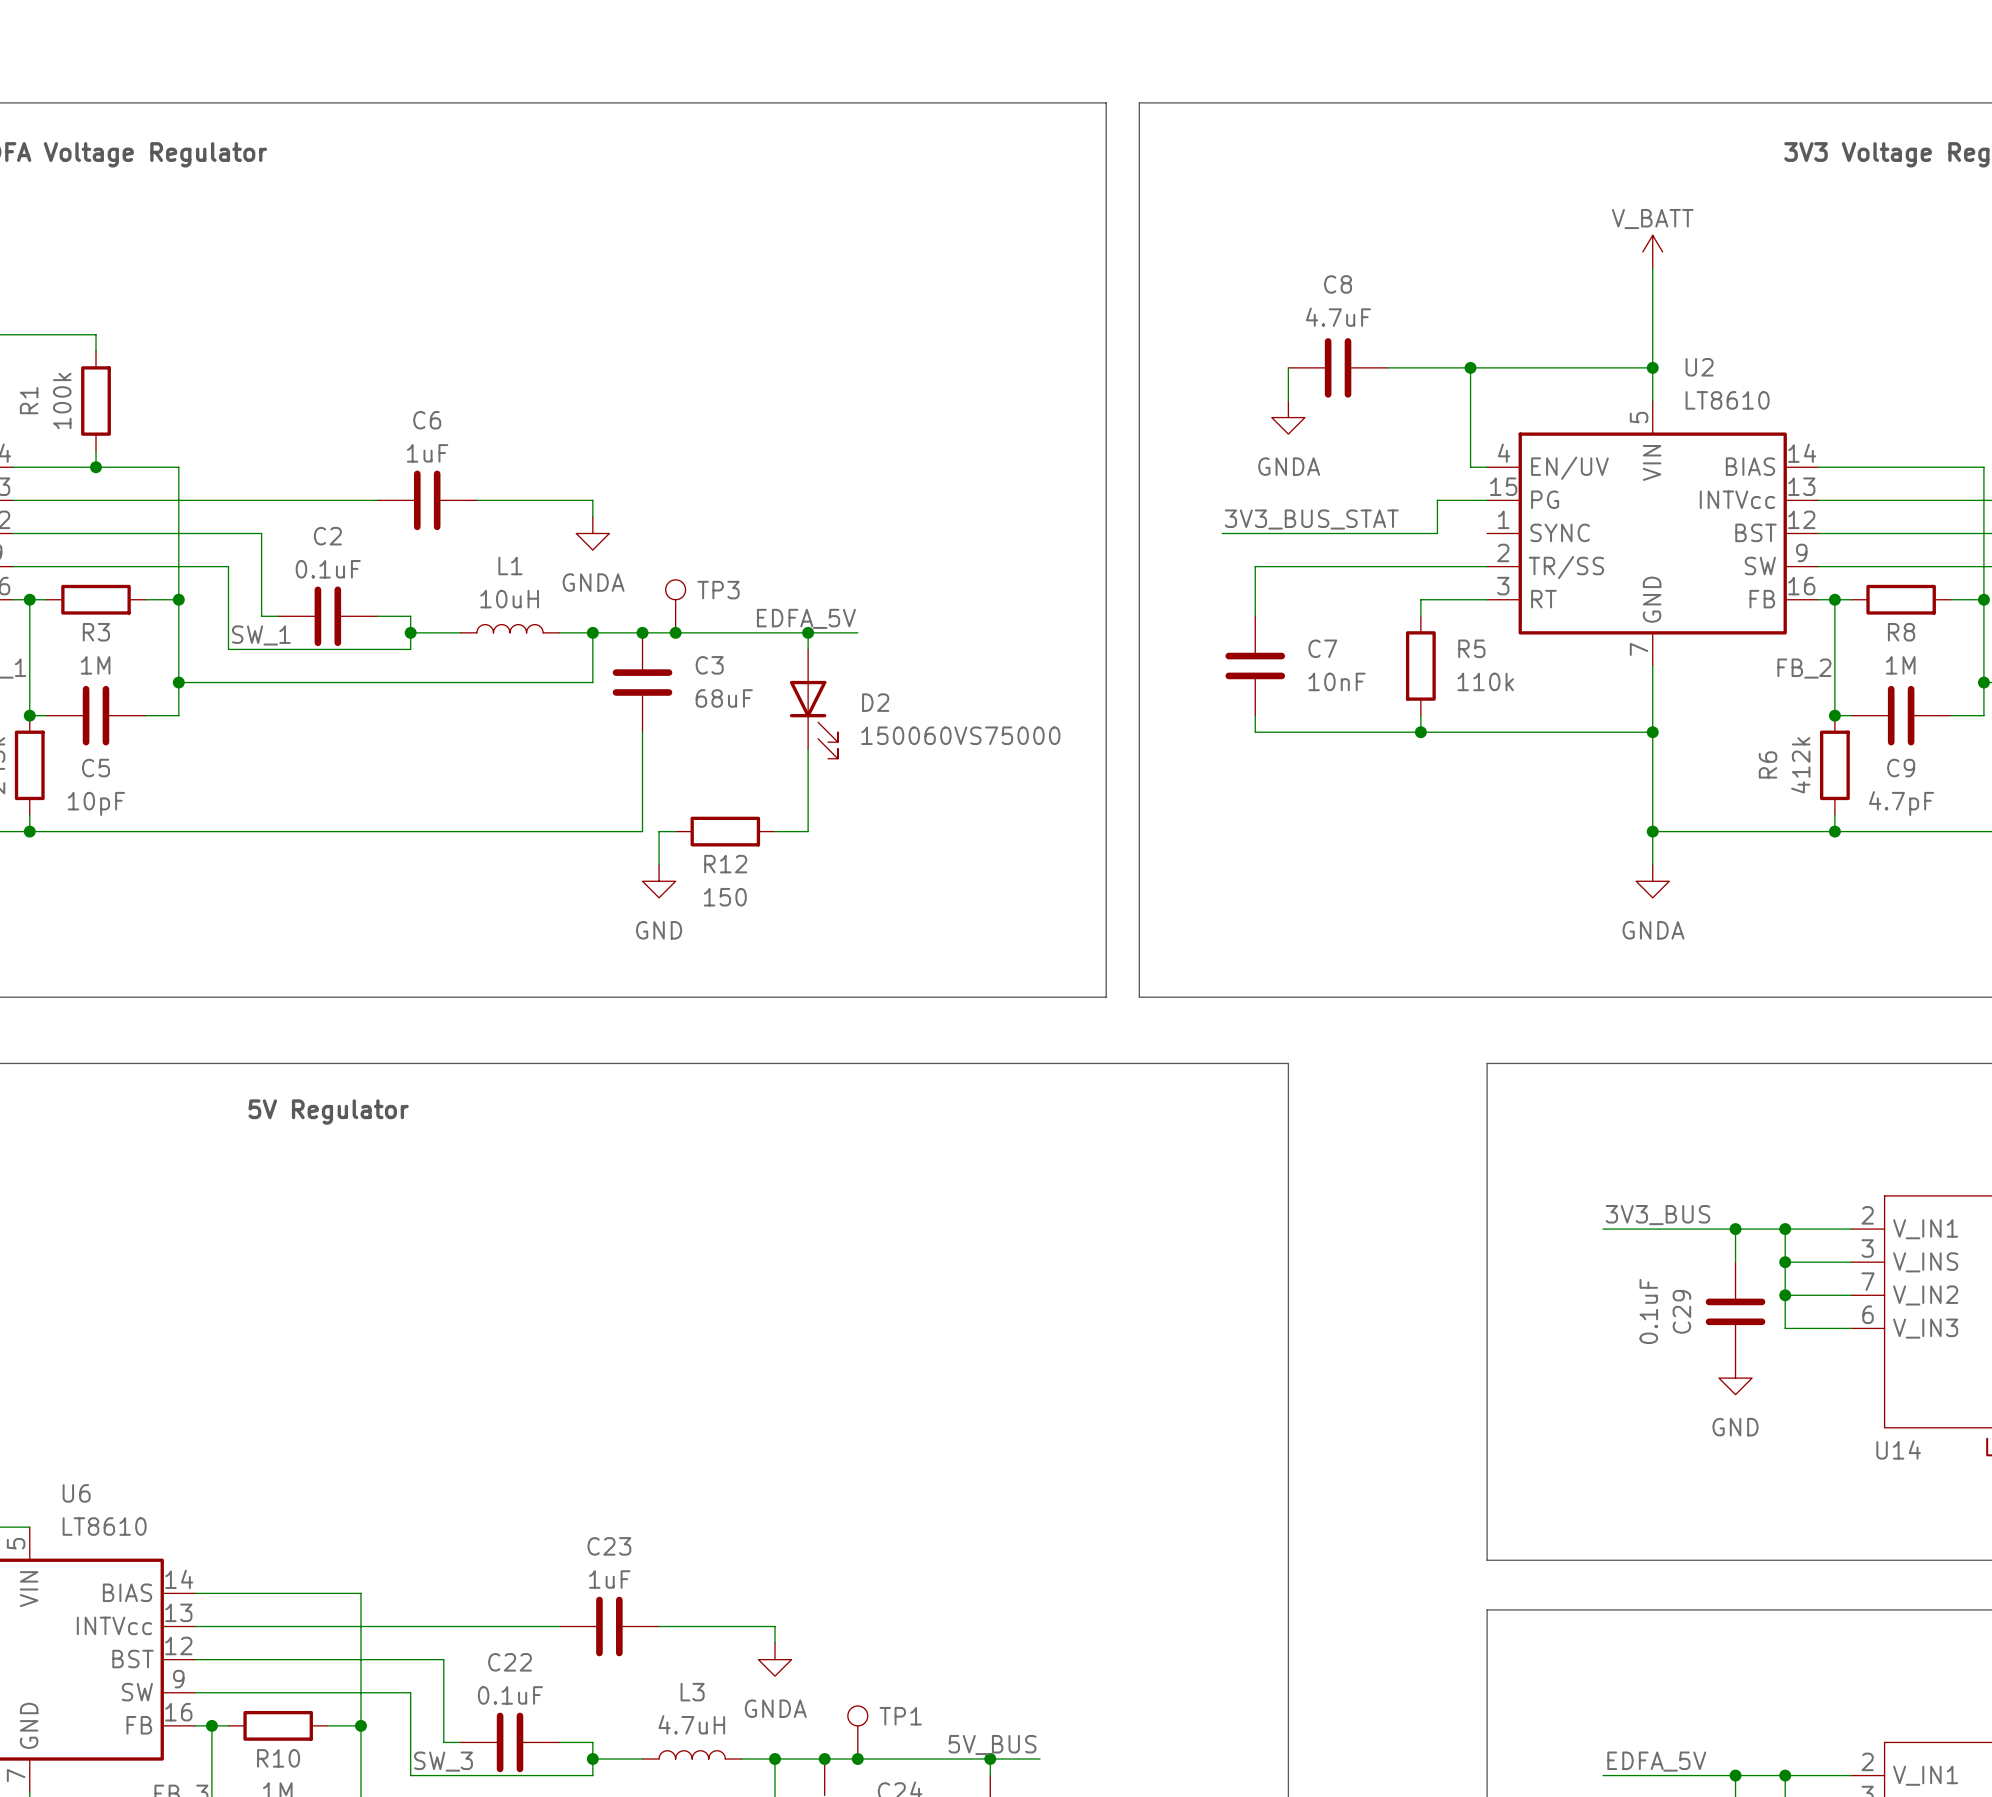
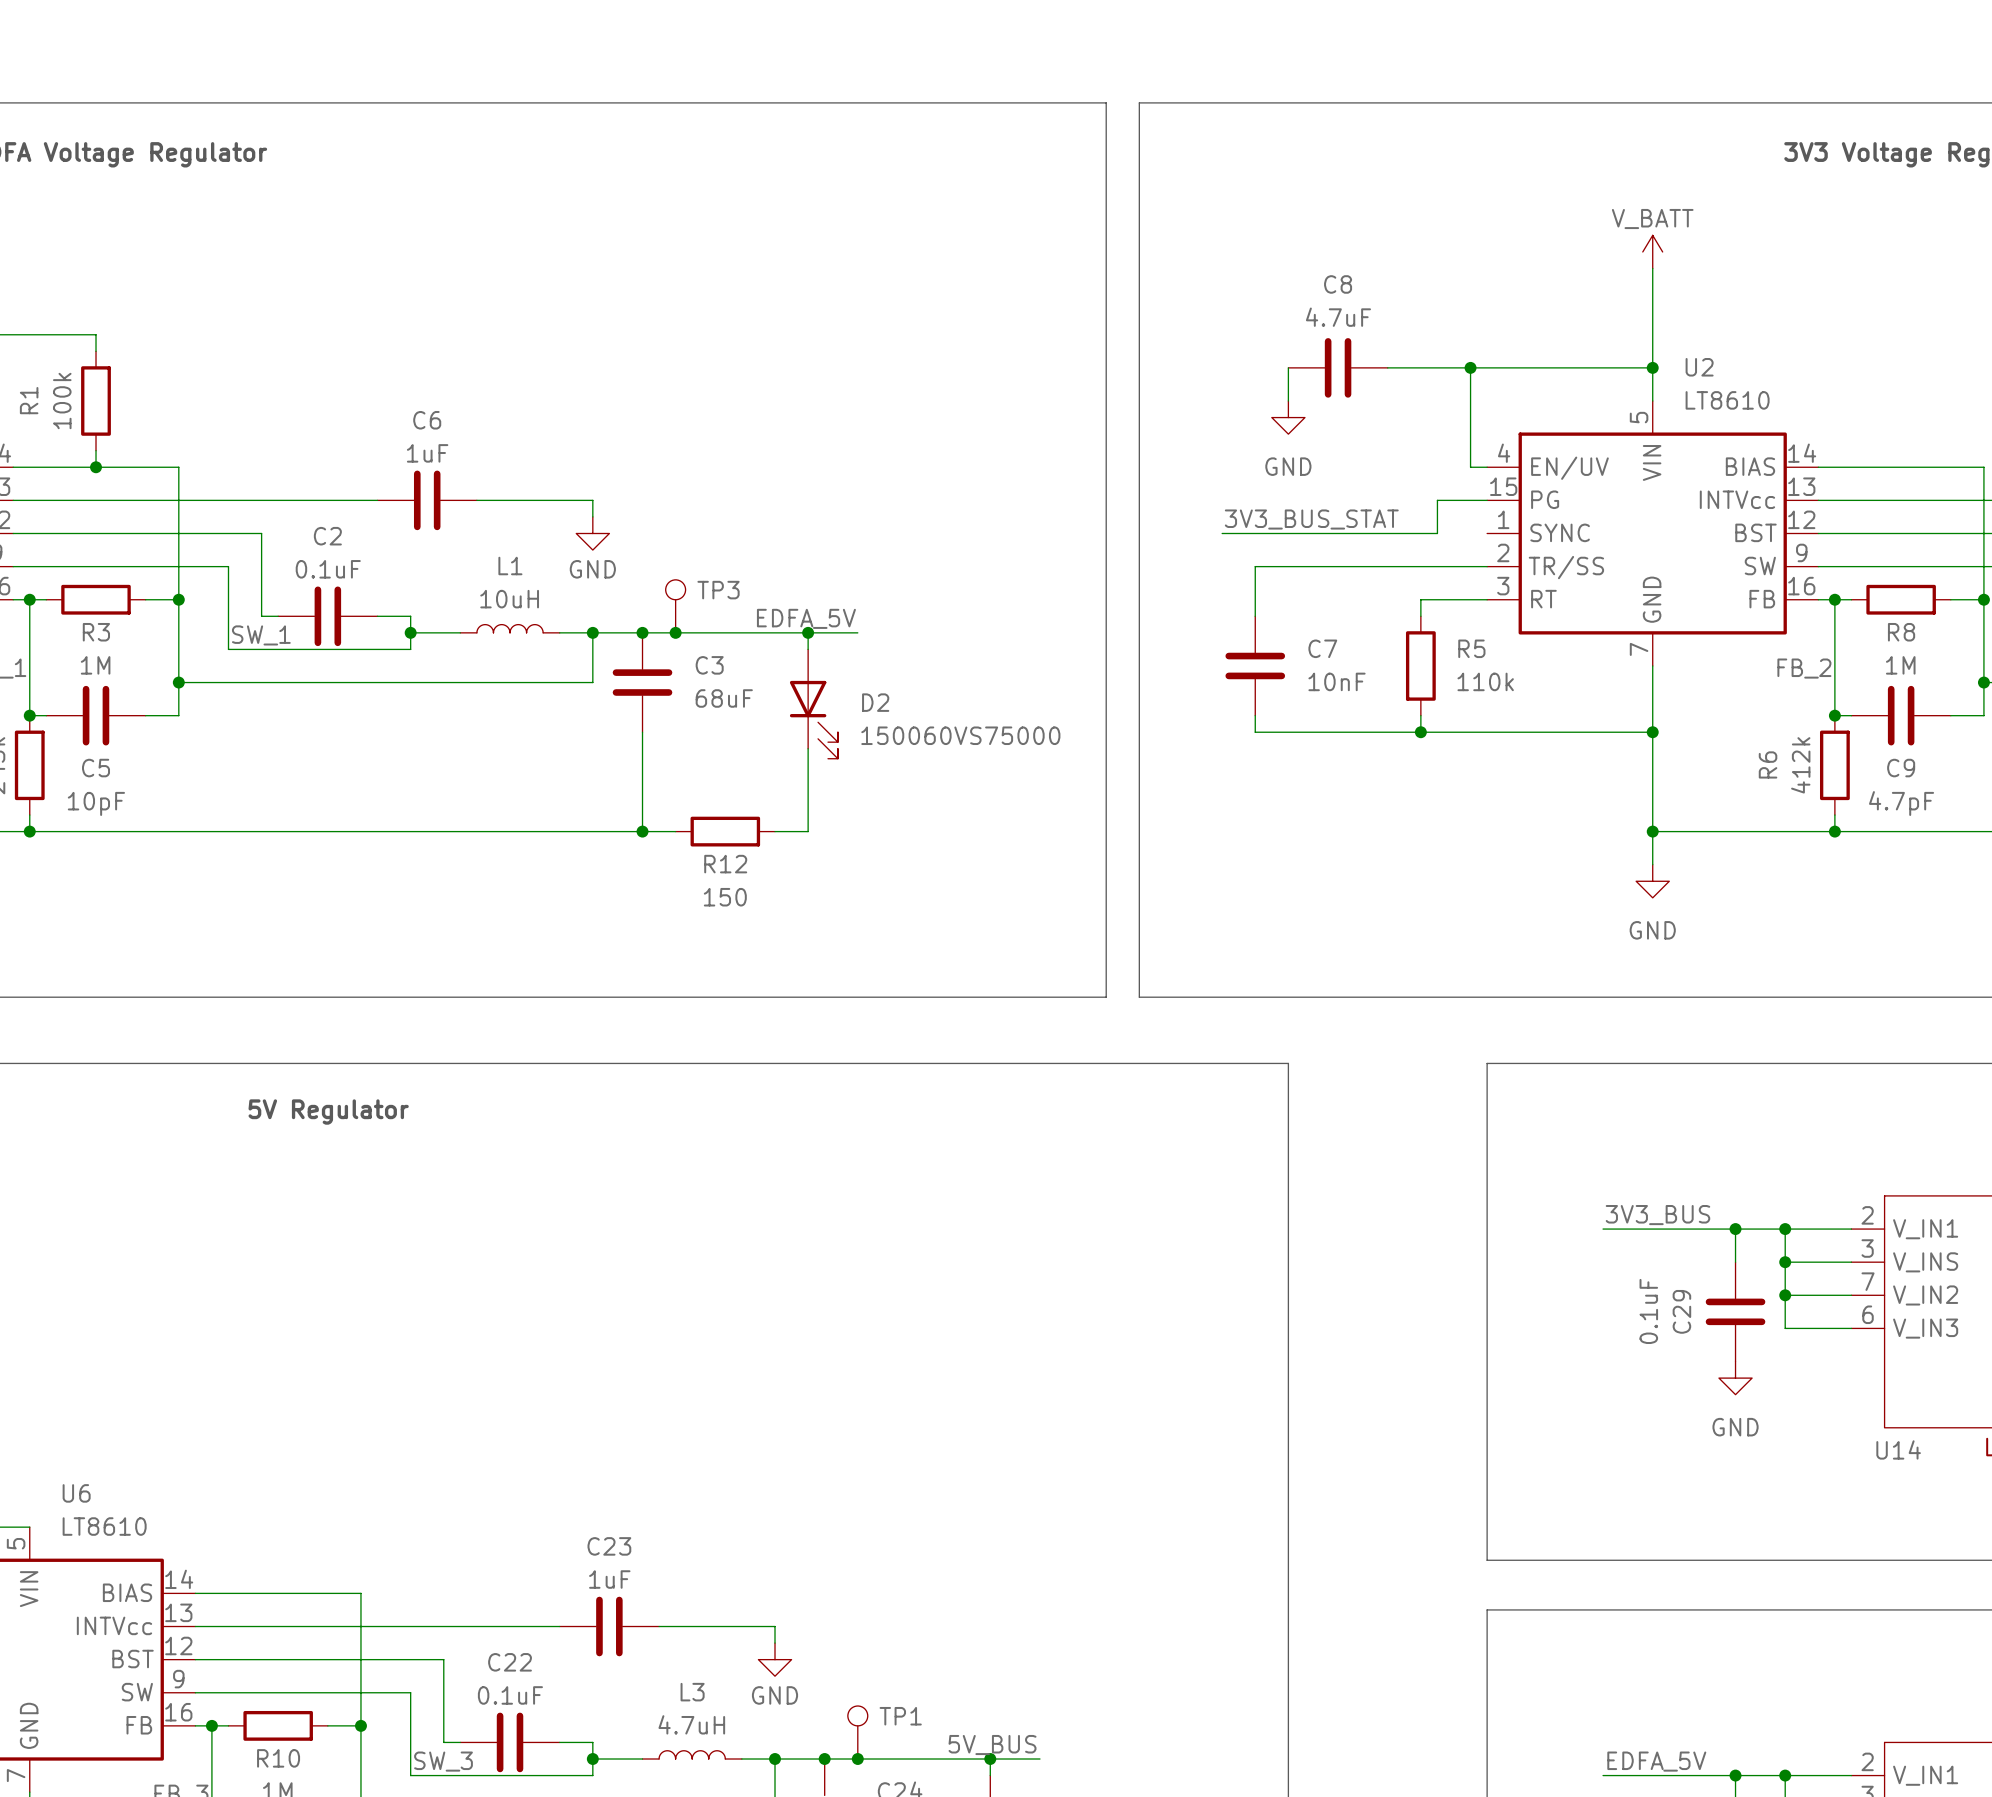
power symbol: GNDA (1288, 417) -> GND (1288, 417)
power symbol: GNDA (592, 533) -> GND (592, 533)
junction: none -> (642, 831)
wire: (659, 831) (659, 864) -> (659, 831) (642, 831)
power symbol: GND (659, 881) -> none
power symbol: GNDA (1652, 881) -> GND (1652, 881)
power symbol: GNDA (775, 1659) -> GND (775, 1659)

